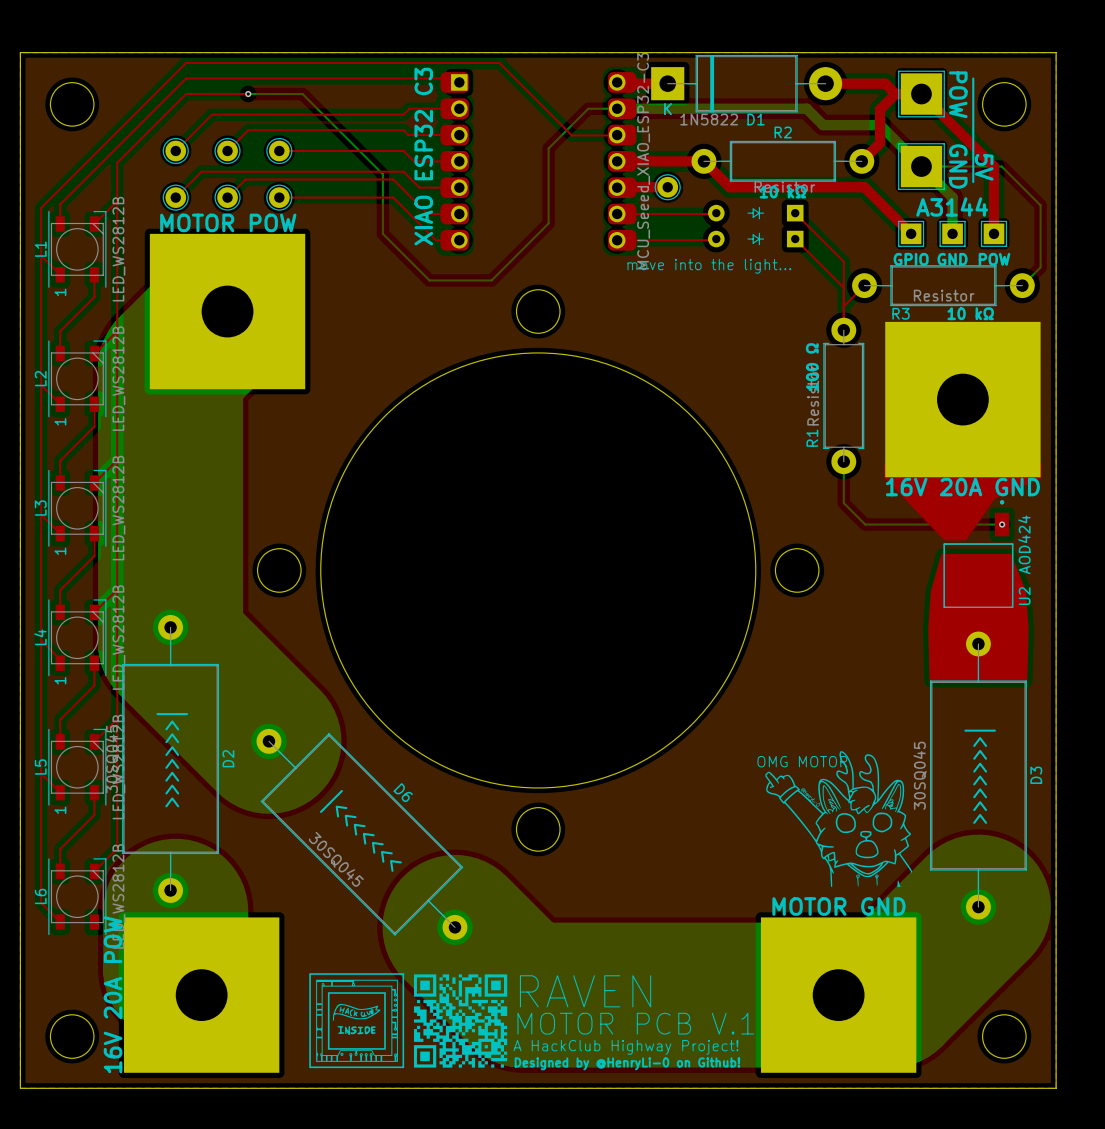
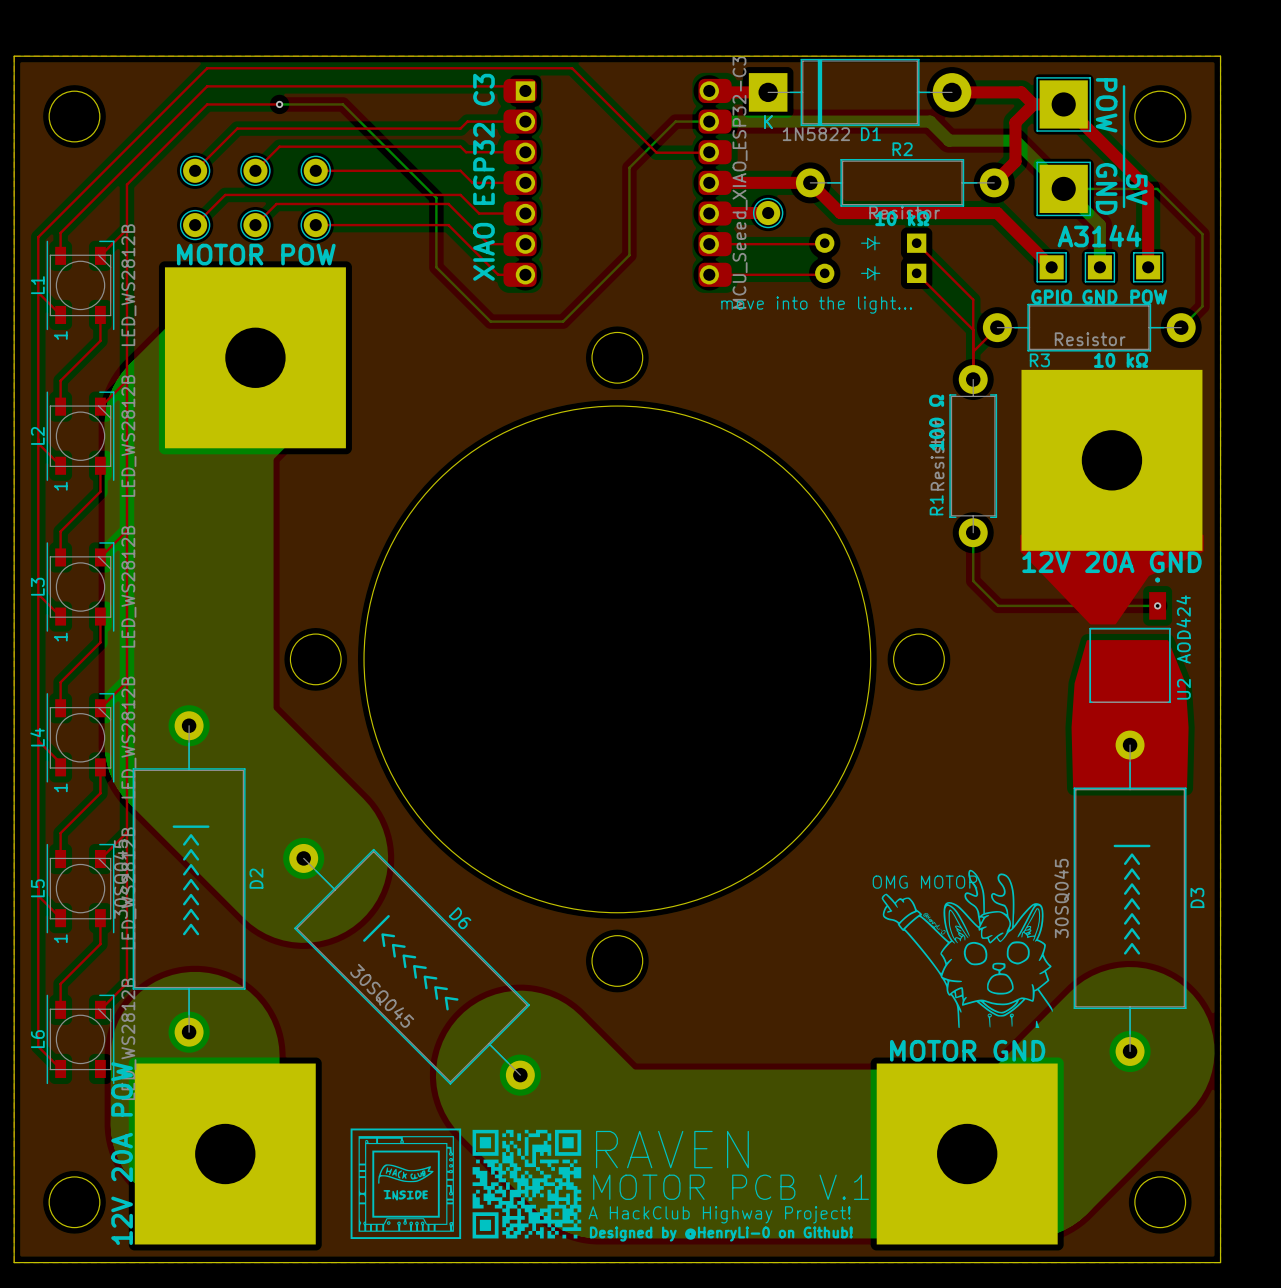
text: 16V 20A GND (962, 487) -> 12V 20A GND (1111, 562)
text: 16V 20A POW (113, 994) -> 12V 20A POW (122, 1153)

